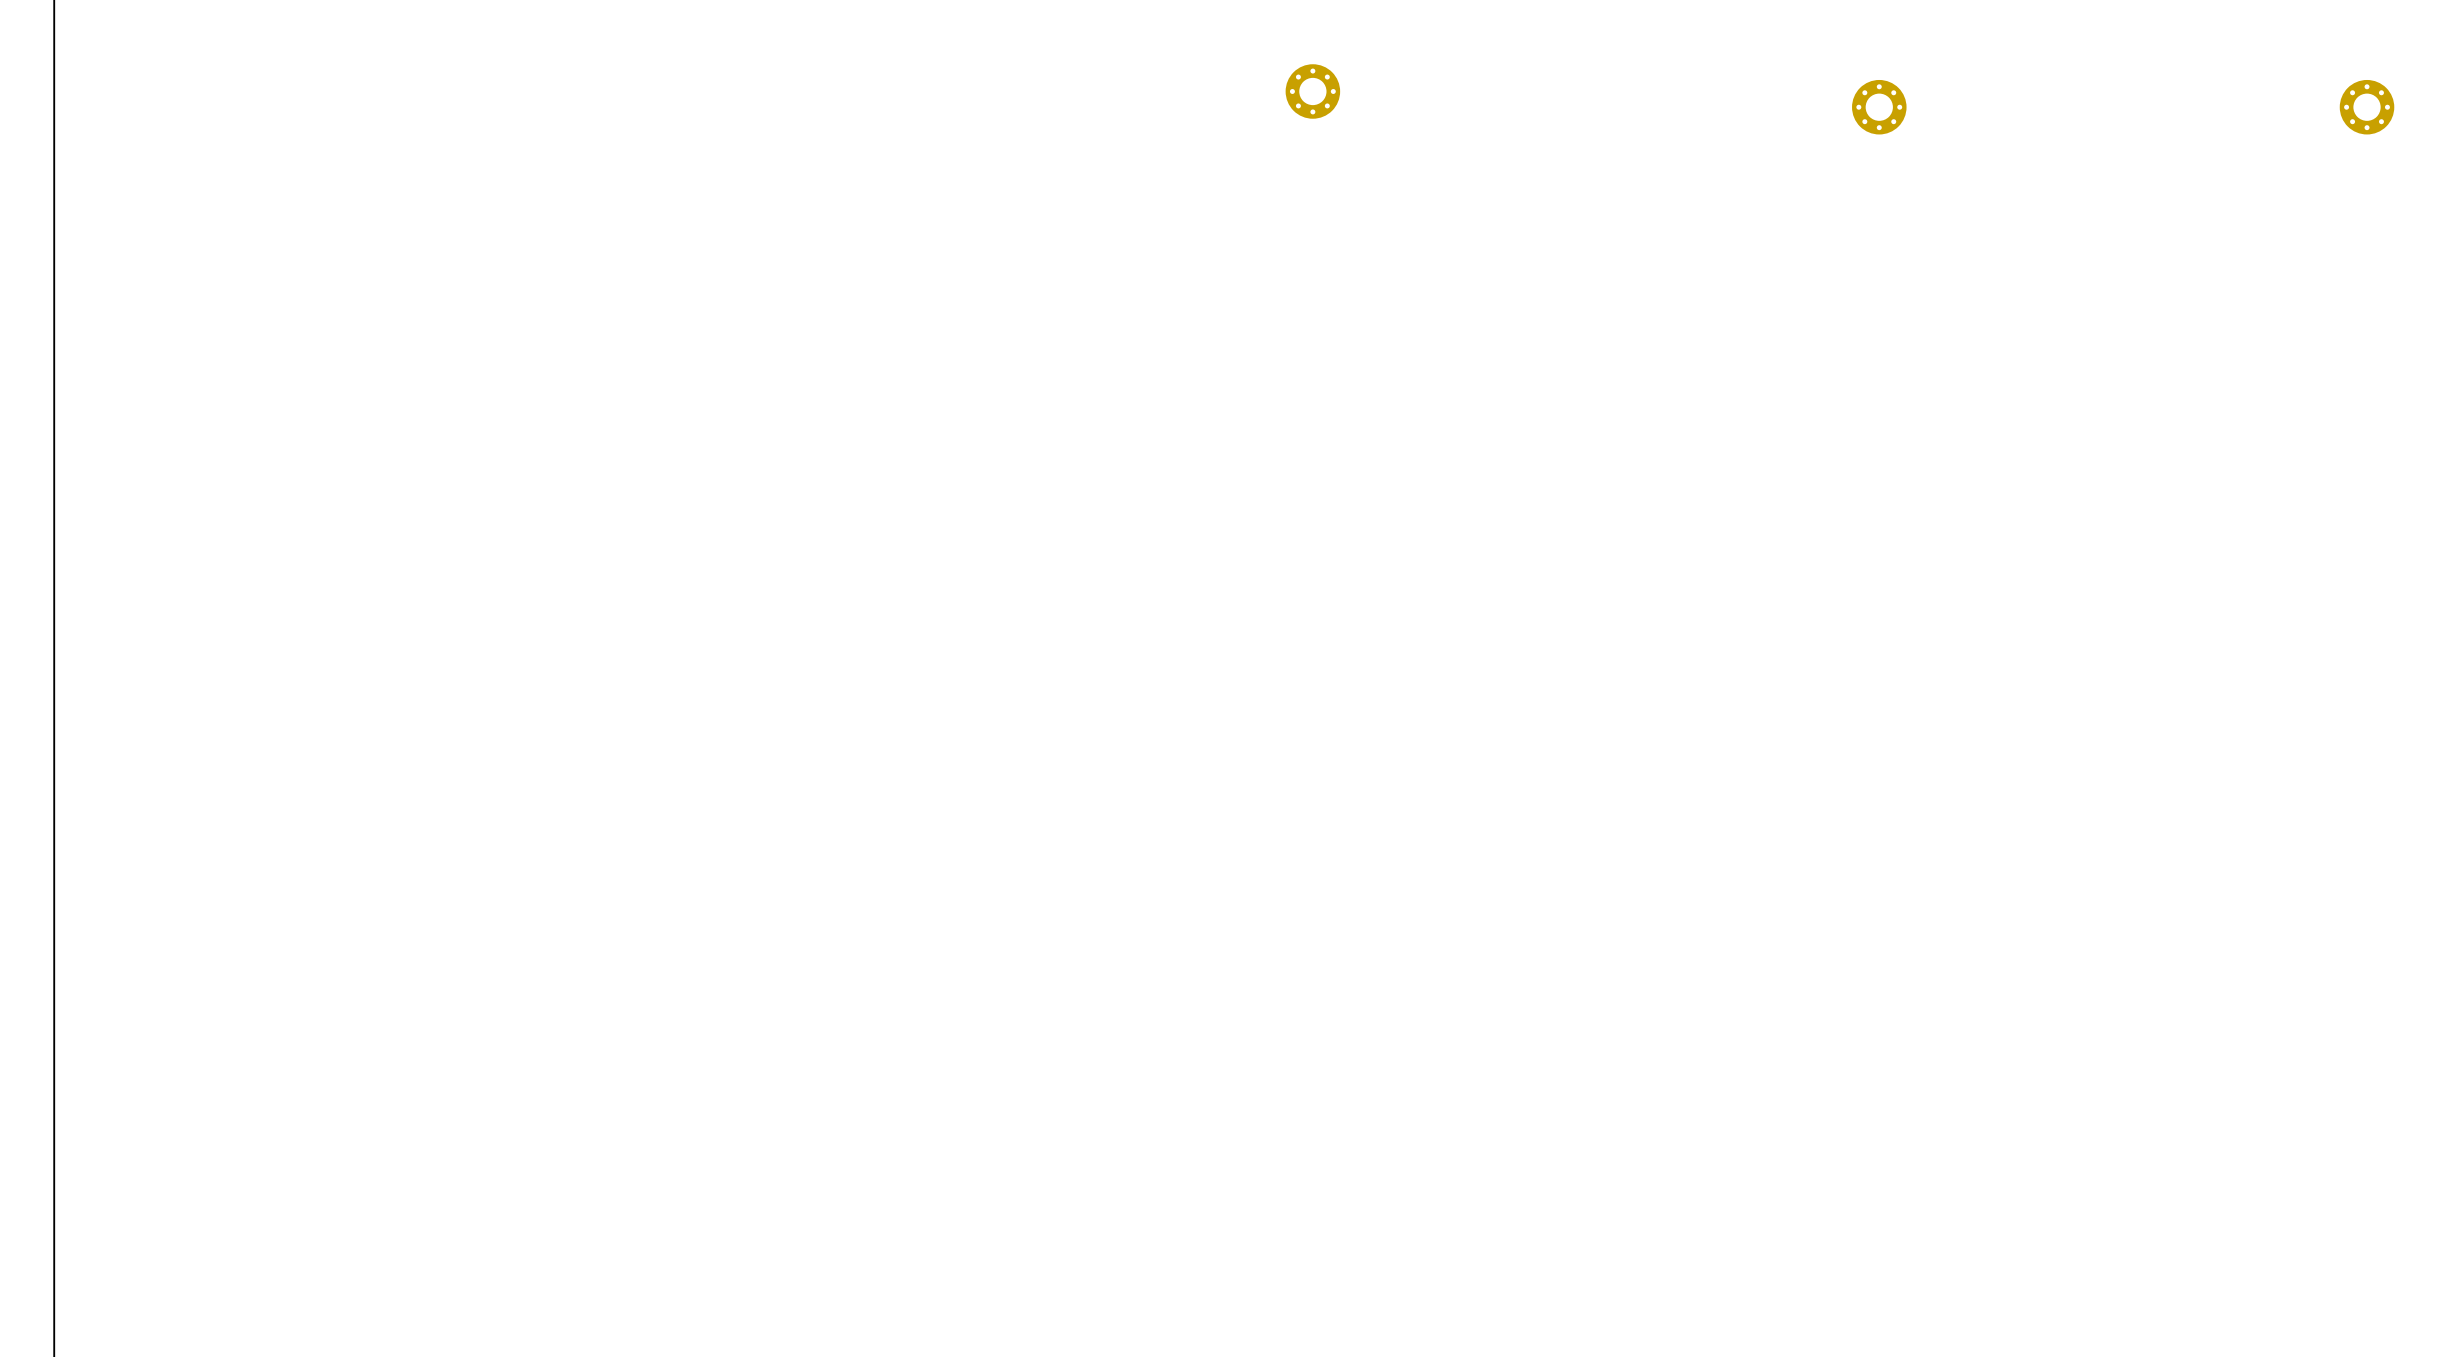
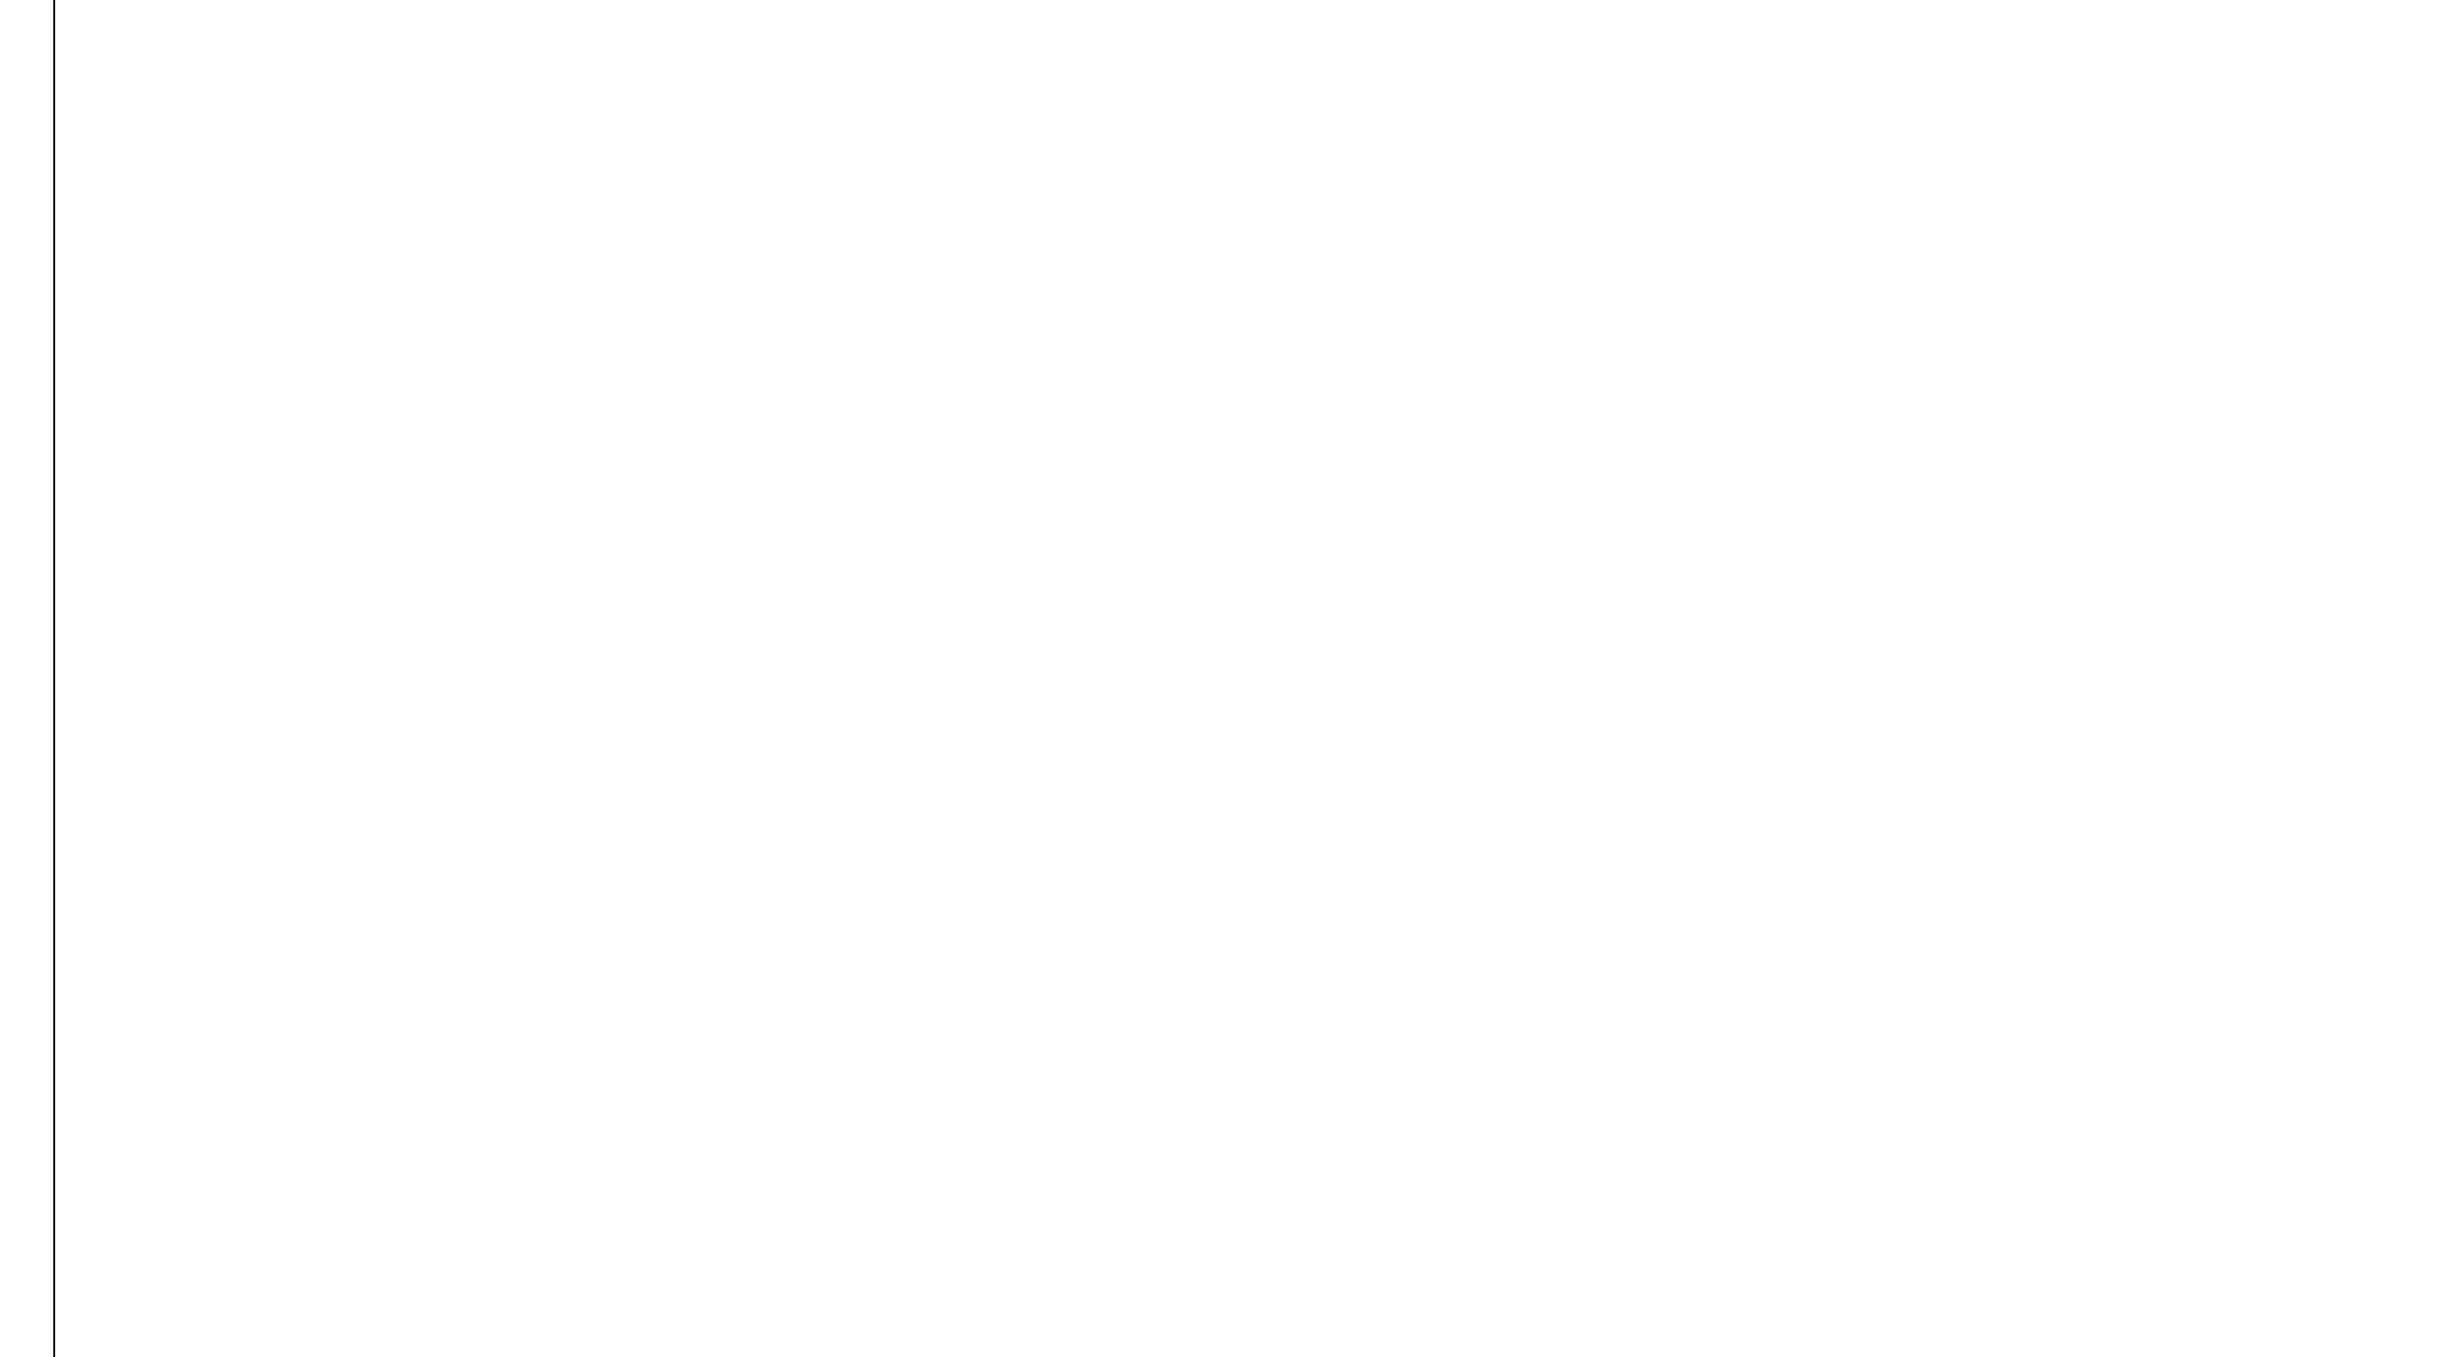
part: (1312, 91) -> none
part: (1879, 107) -> none
part: (2367, 107) -> none

